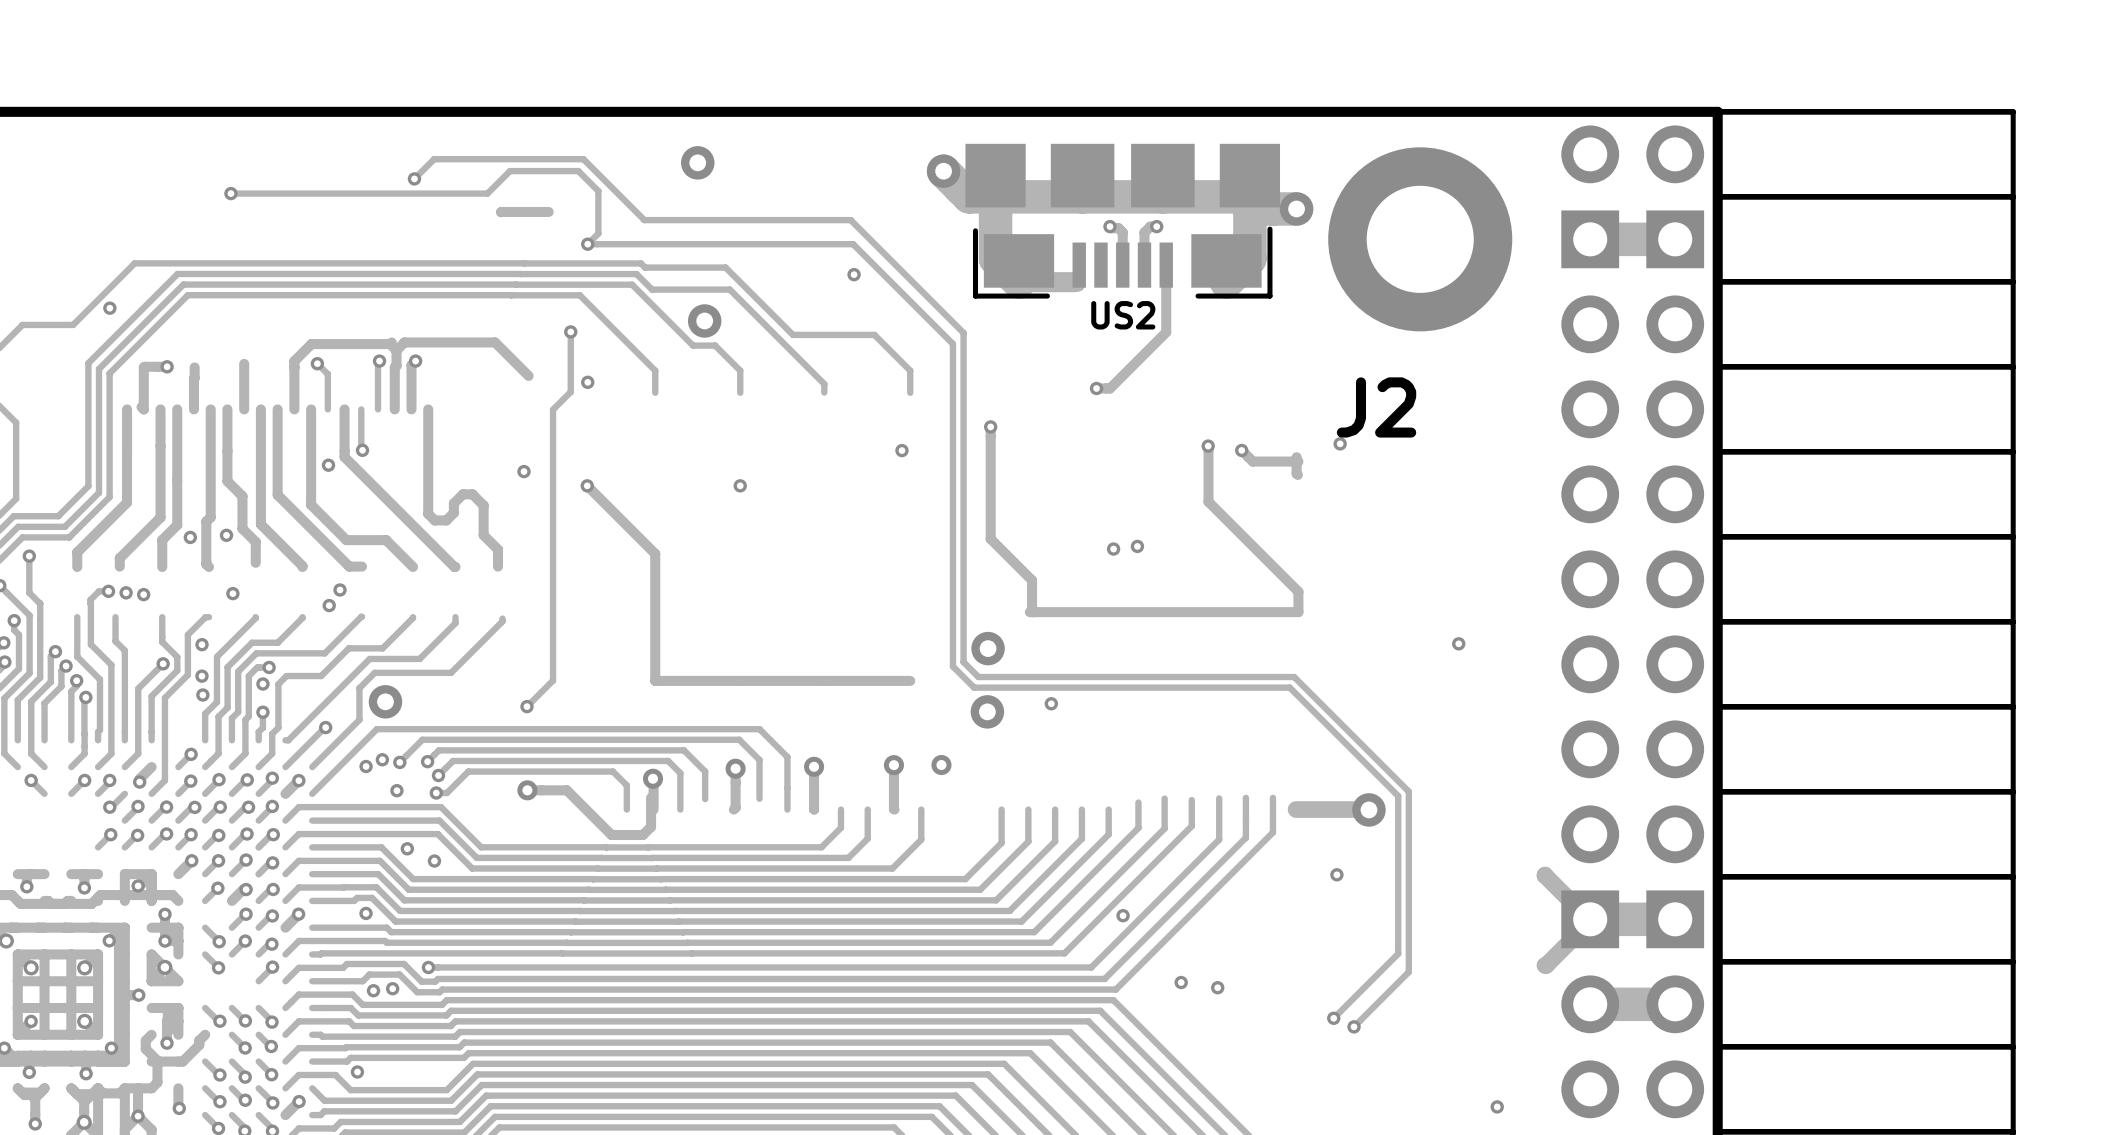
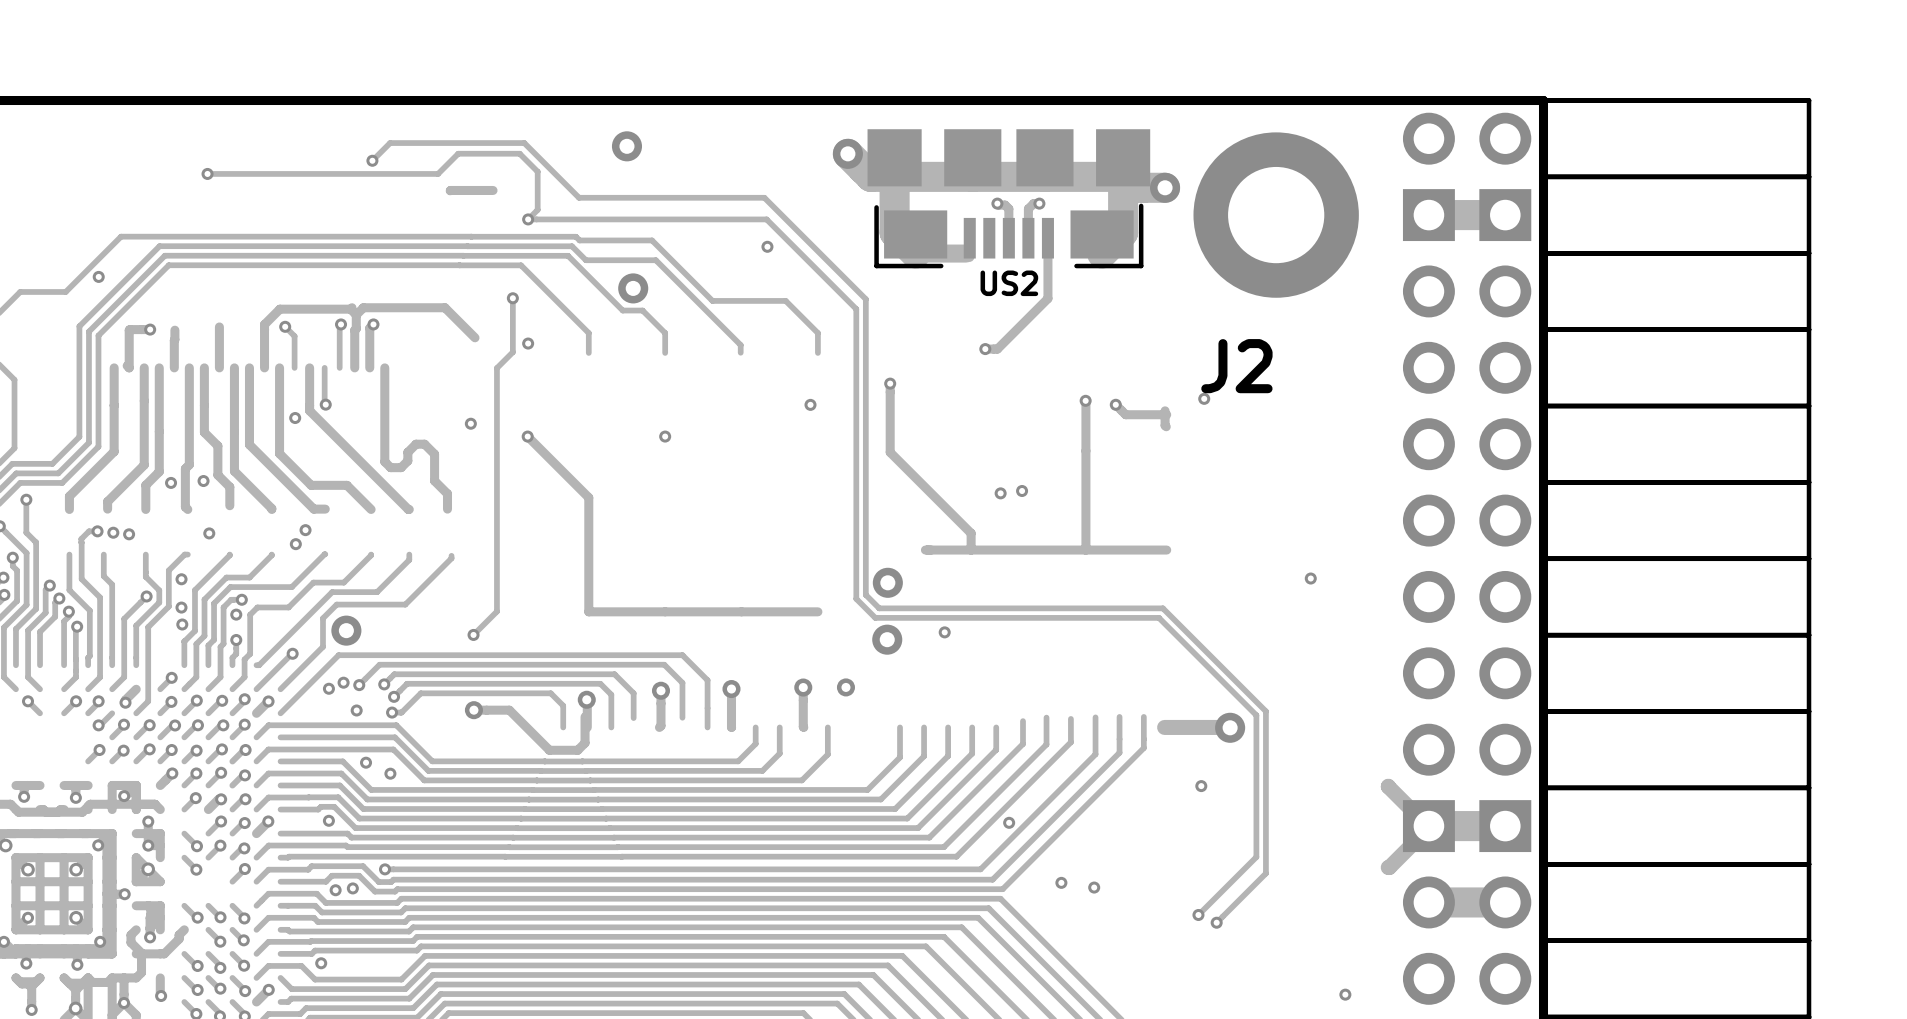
track: (1208, 501) (1298, 591) (1298, 612) -> (1085, 450) (1085, 549)
track: (990, 503) (990, 538) (1032, 580) (1032, 612) -> (890, 452) (971, 533) (971, 550)

